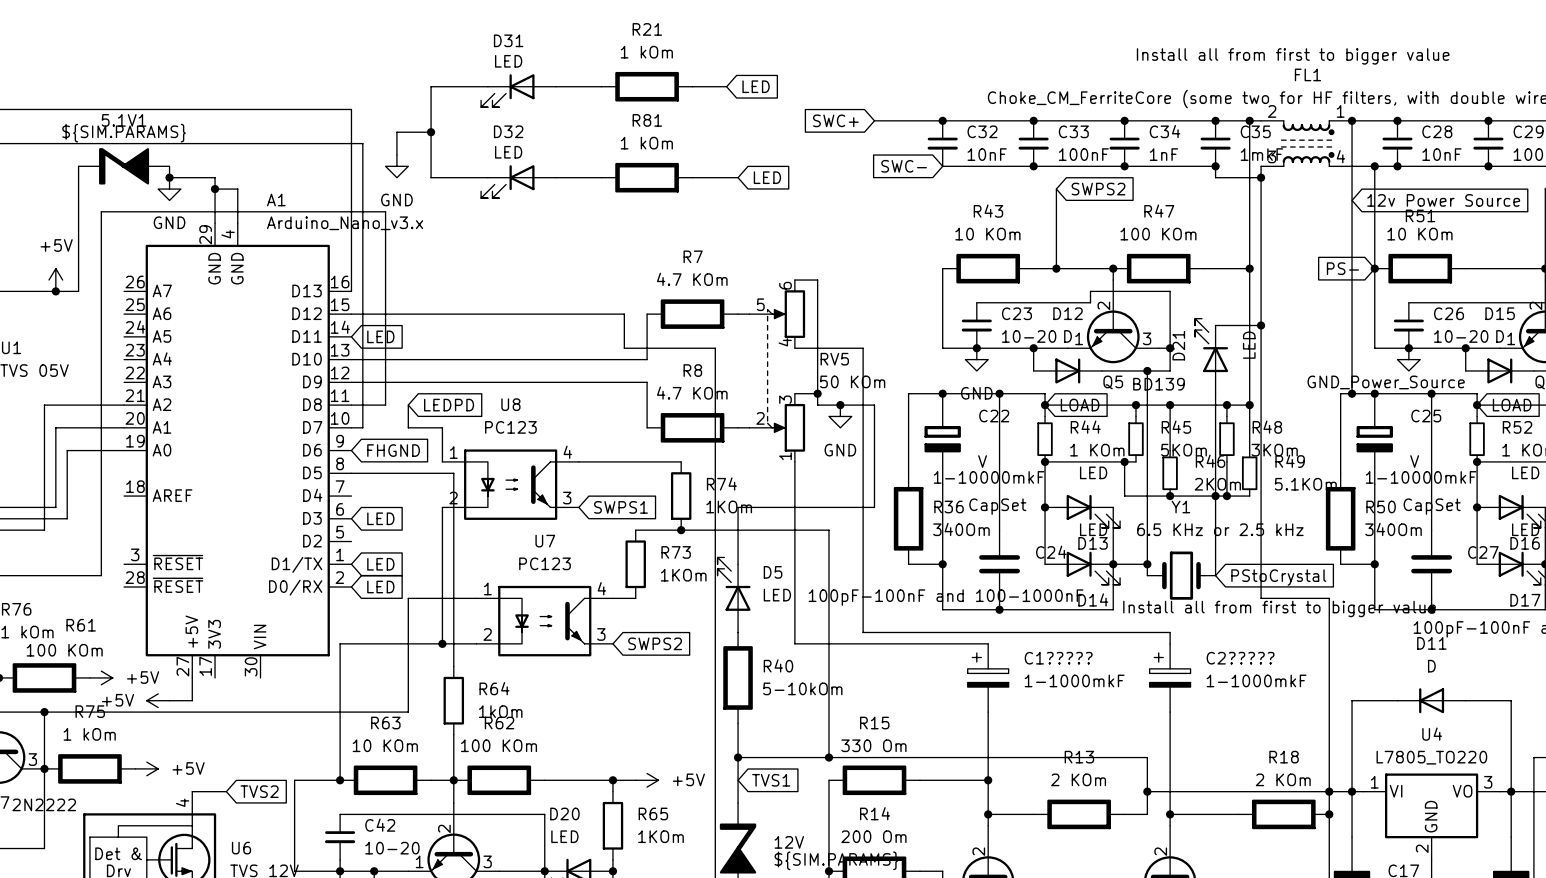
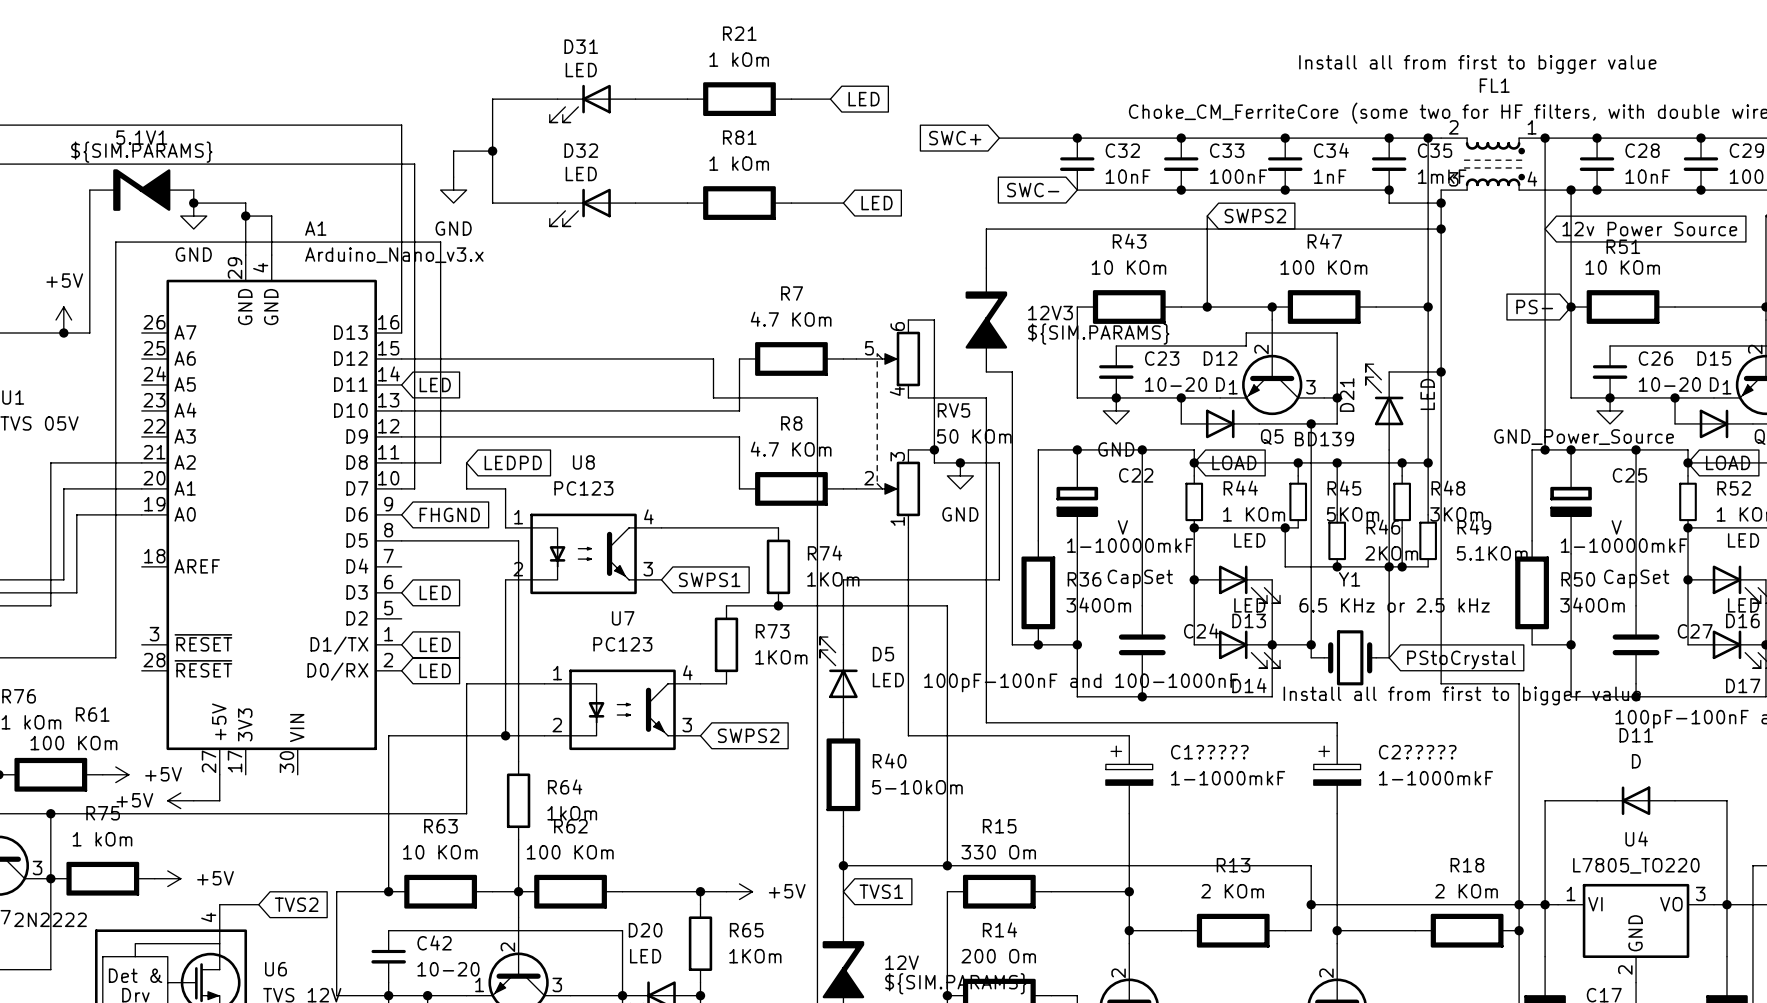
wire: none -> (1441, 229) (986, 229) (986, 268)
junction: none -> (1441, 229)
12V3: none -> ${SIM.PARAMS} (986, 320)
wire: none -> (986, 371) (1012, 371) (1012, 644) (1038, 644)
junction: none -> (1038, 644)

